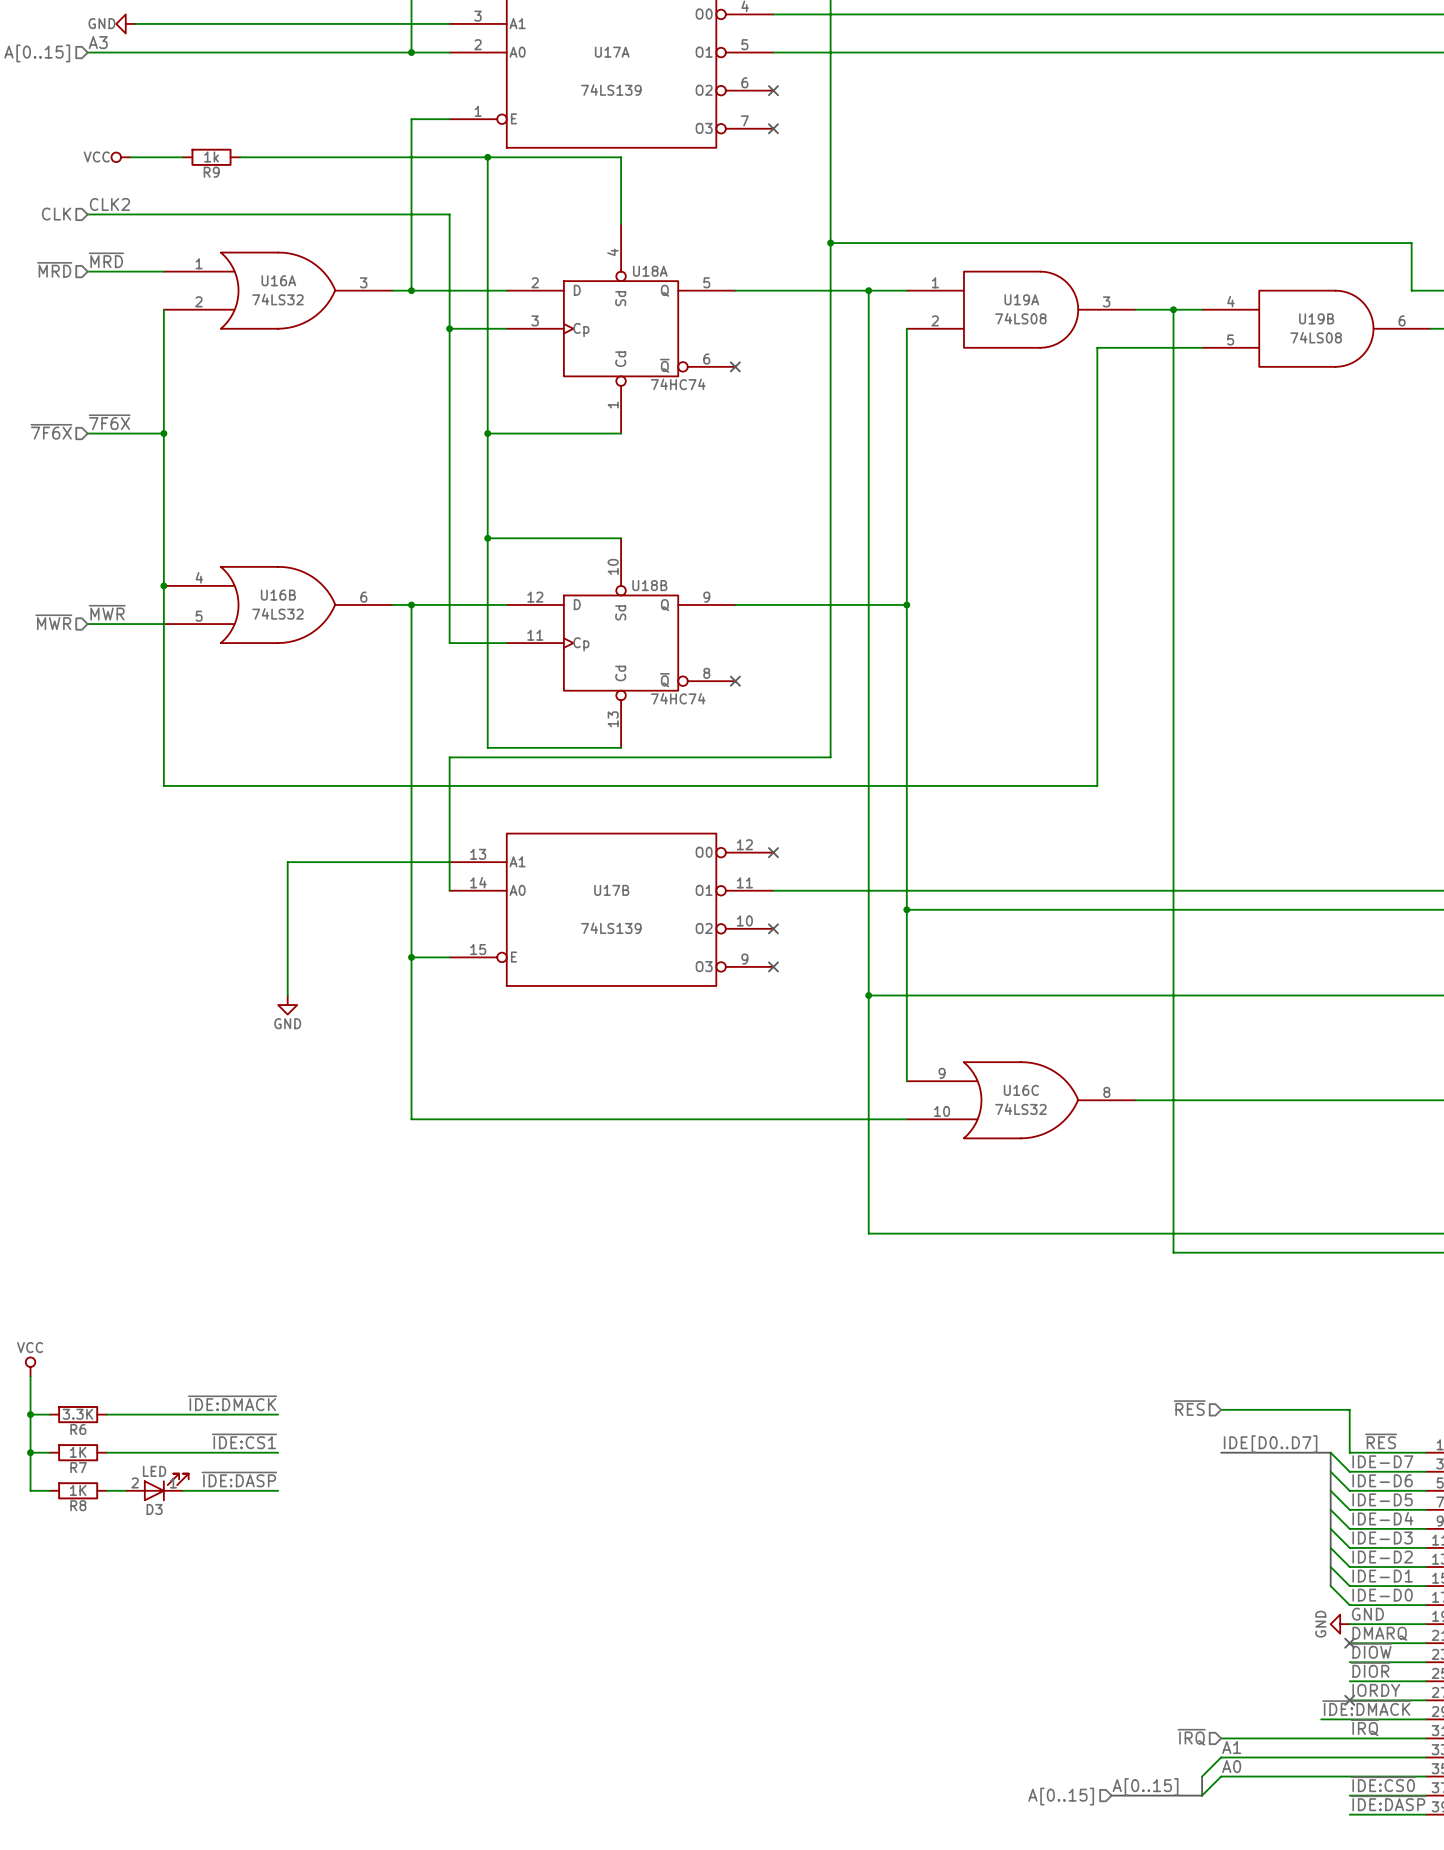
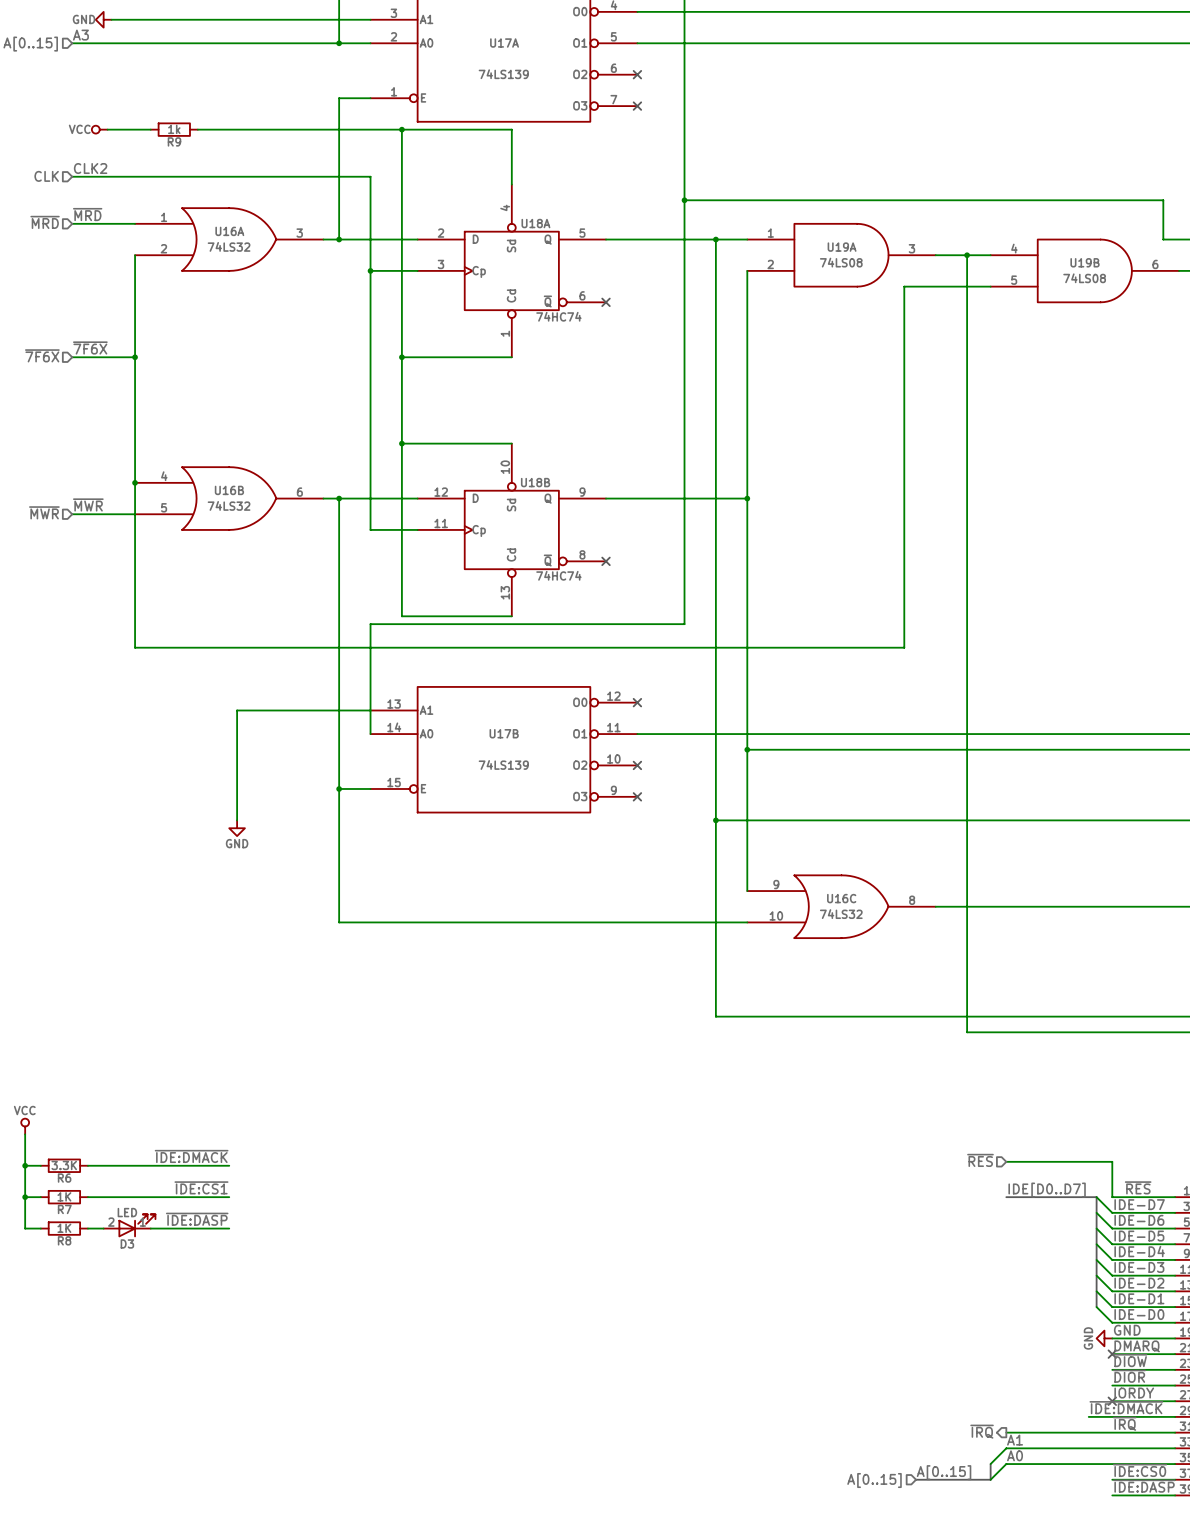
hierarchical label shape: input (1191, 1737) -> output (982, 1431)

